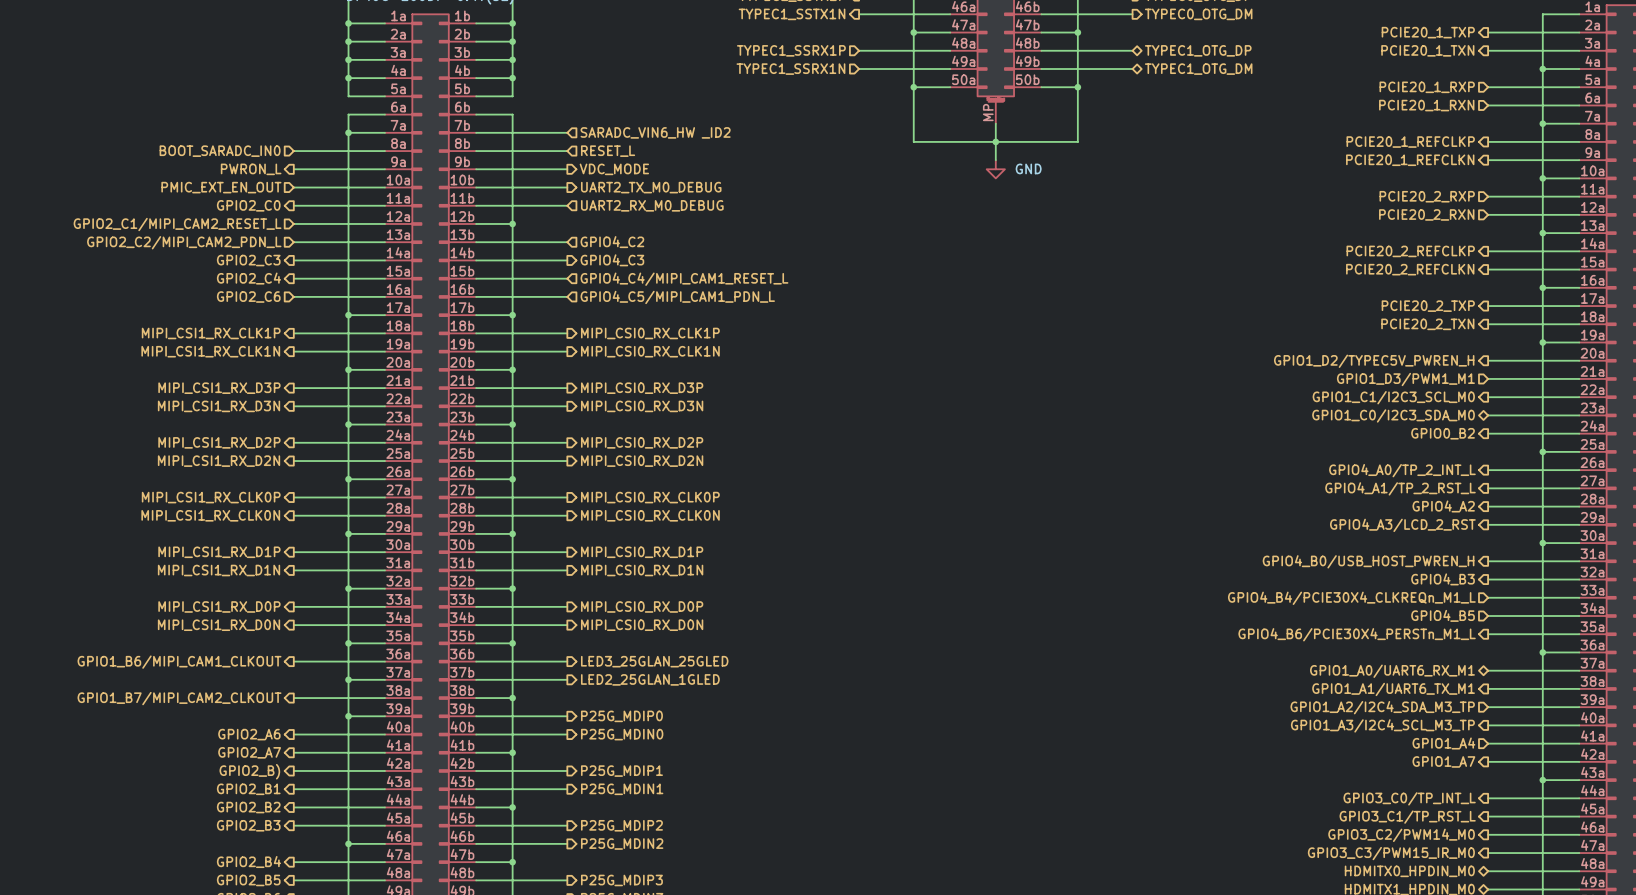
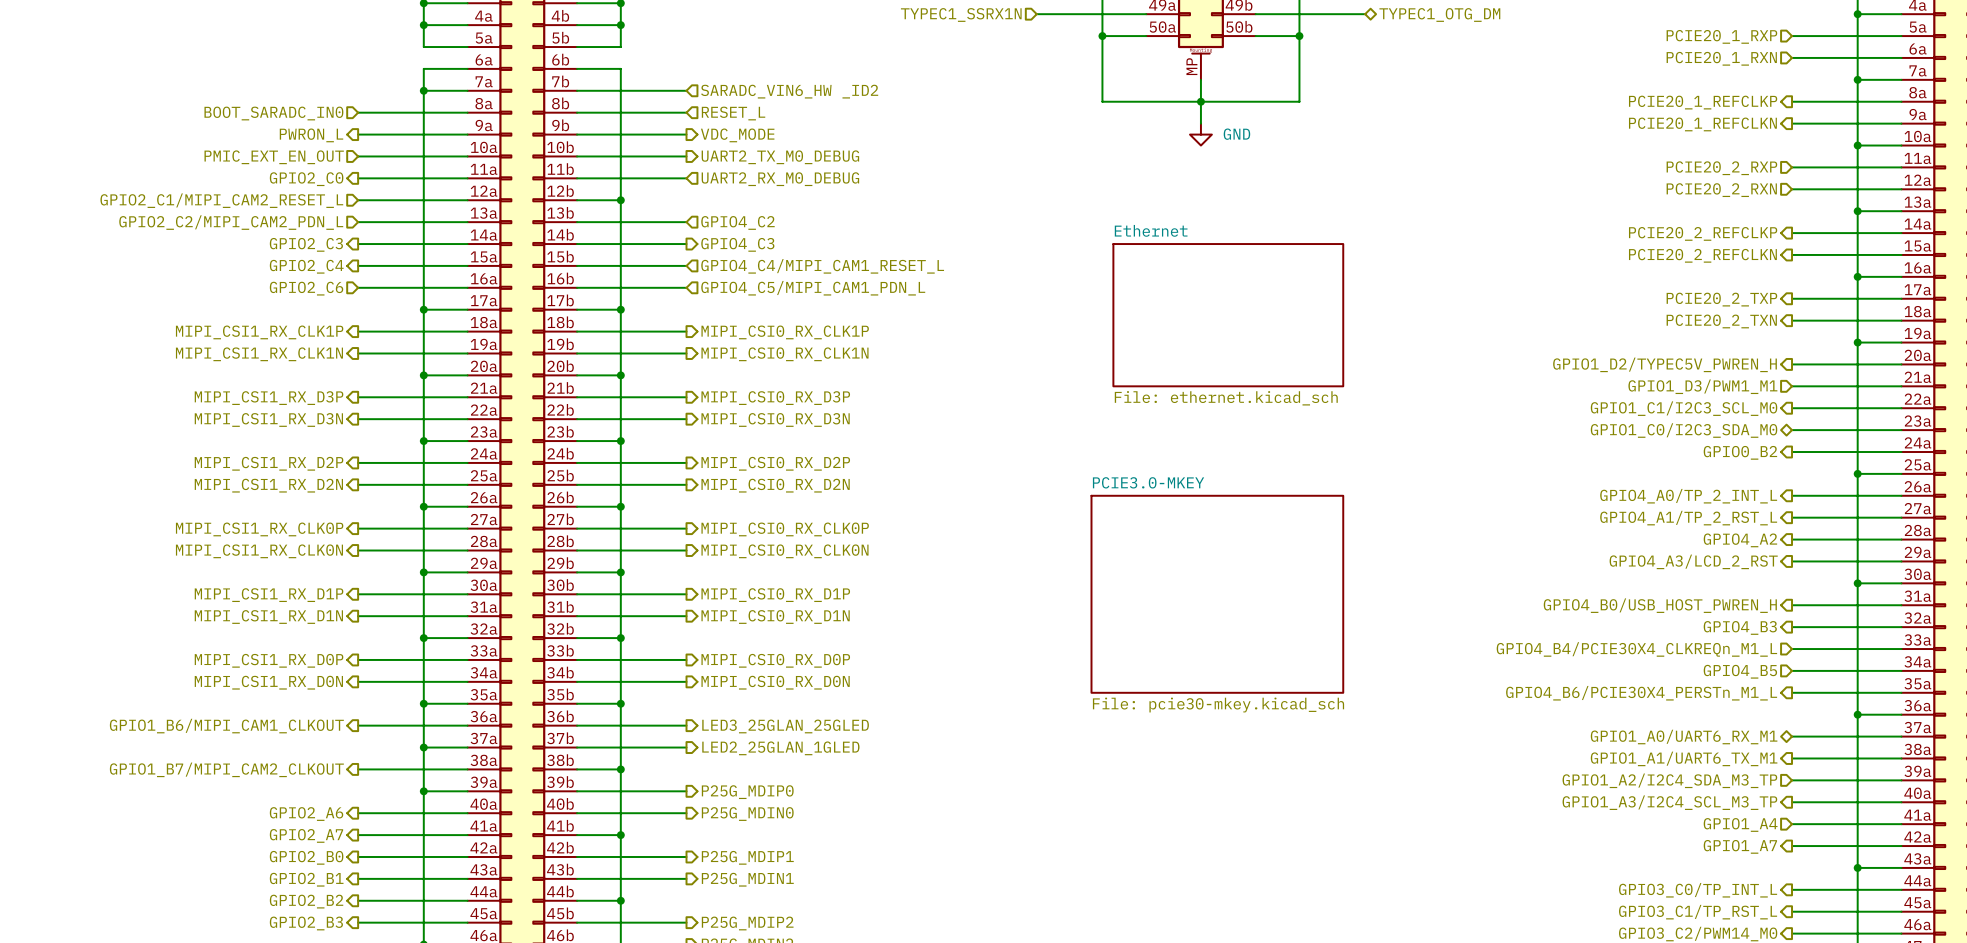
sheet Ethernet: none -> File: ethernet.kicad_sch (1228, 315)
sheet PCIE3.0-MKEY: none -> File: pcie30-mkey.kicad_sch (1217, 594)
hierarchical label: GPIO2_B) (249, 771) -> GPIO2_B0 (306, 857)

